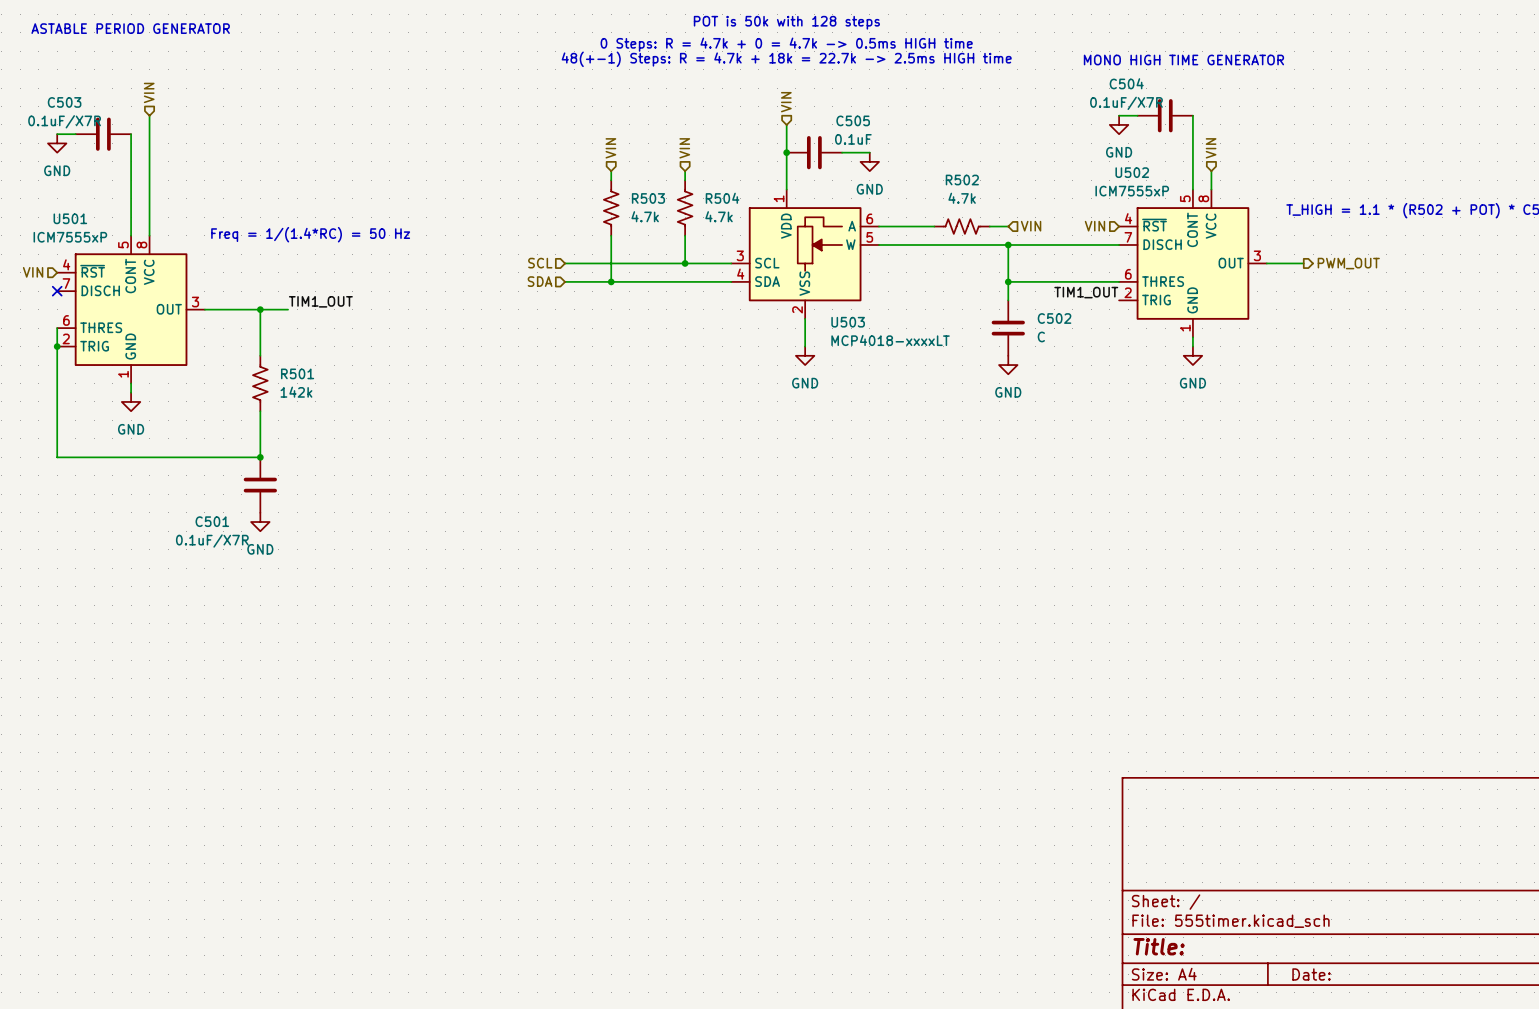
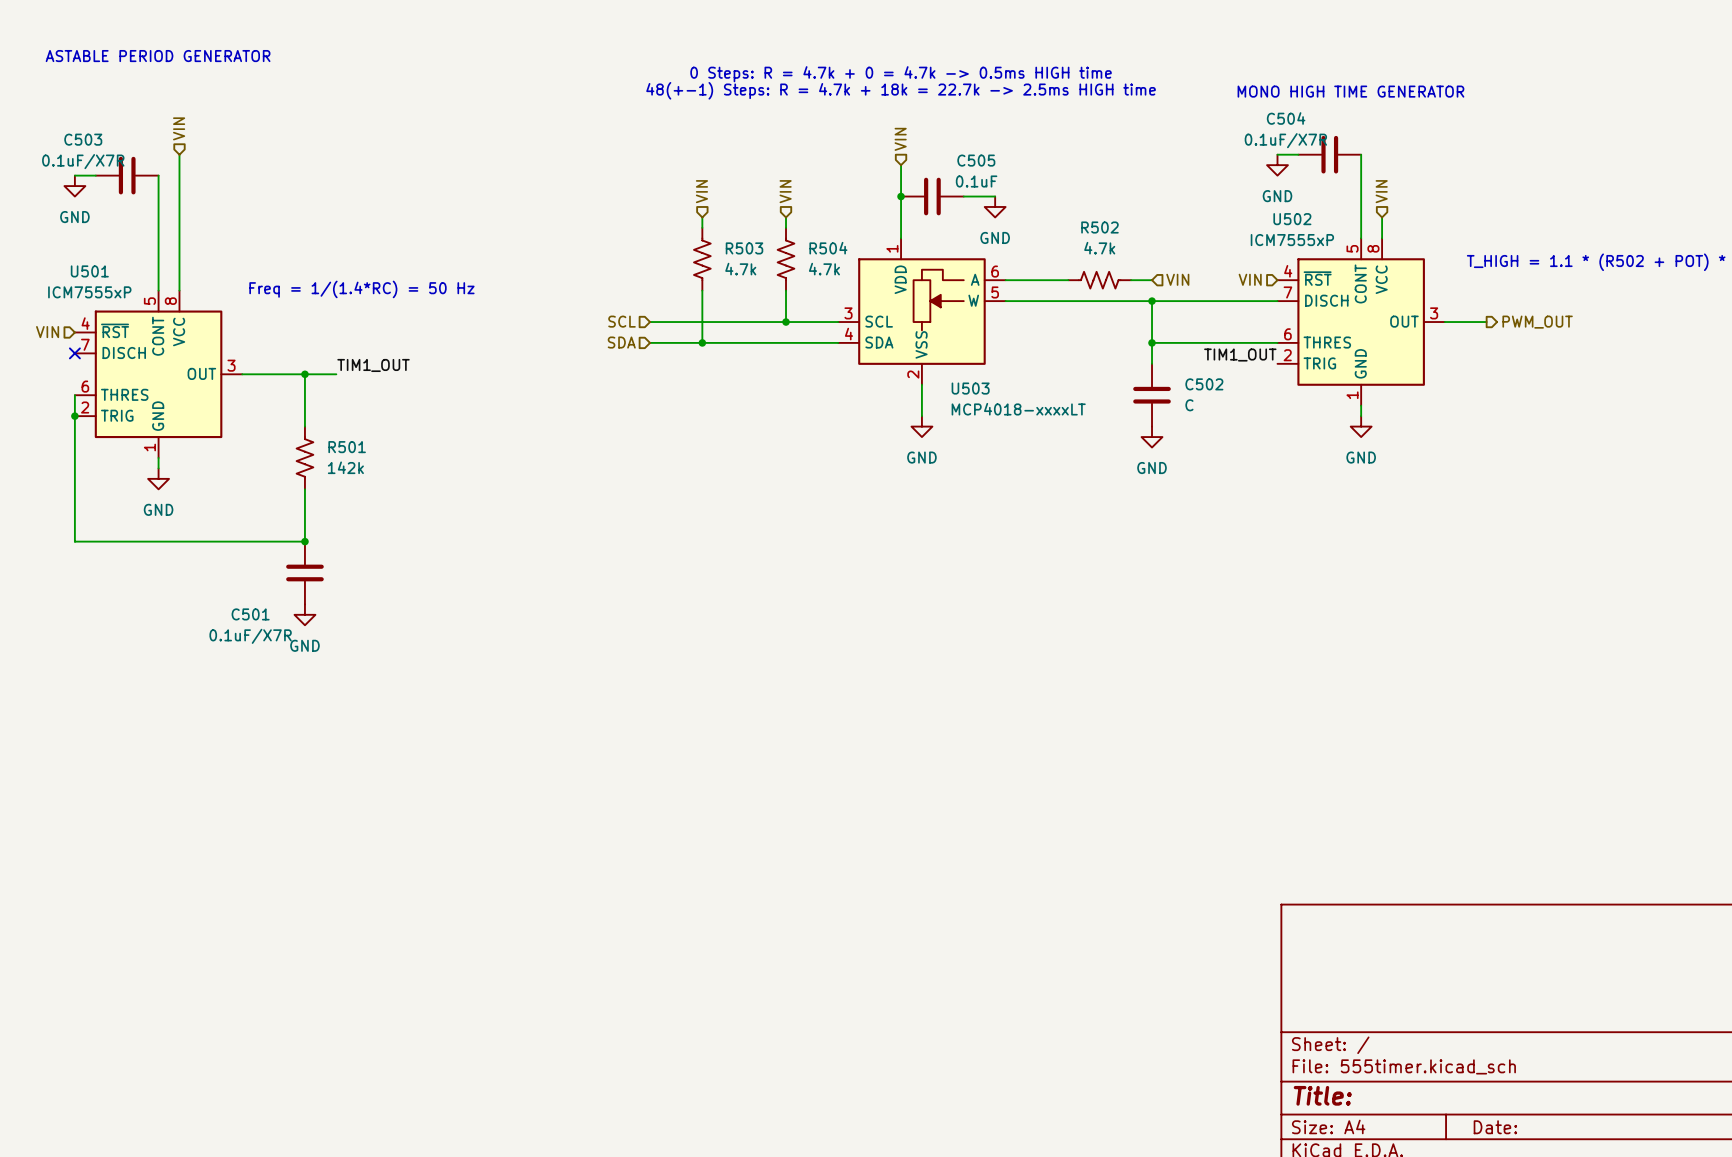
text: POT is 50k with 128 steps (786, 22) -> none

